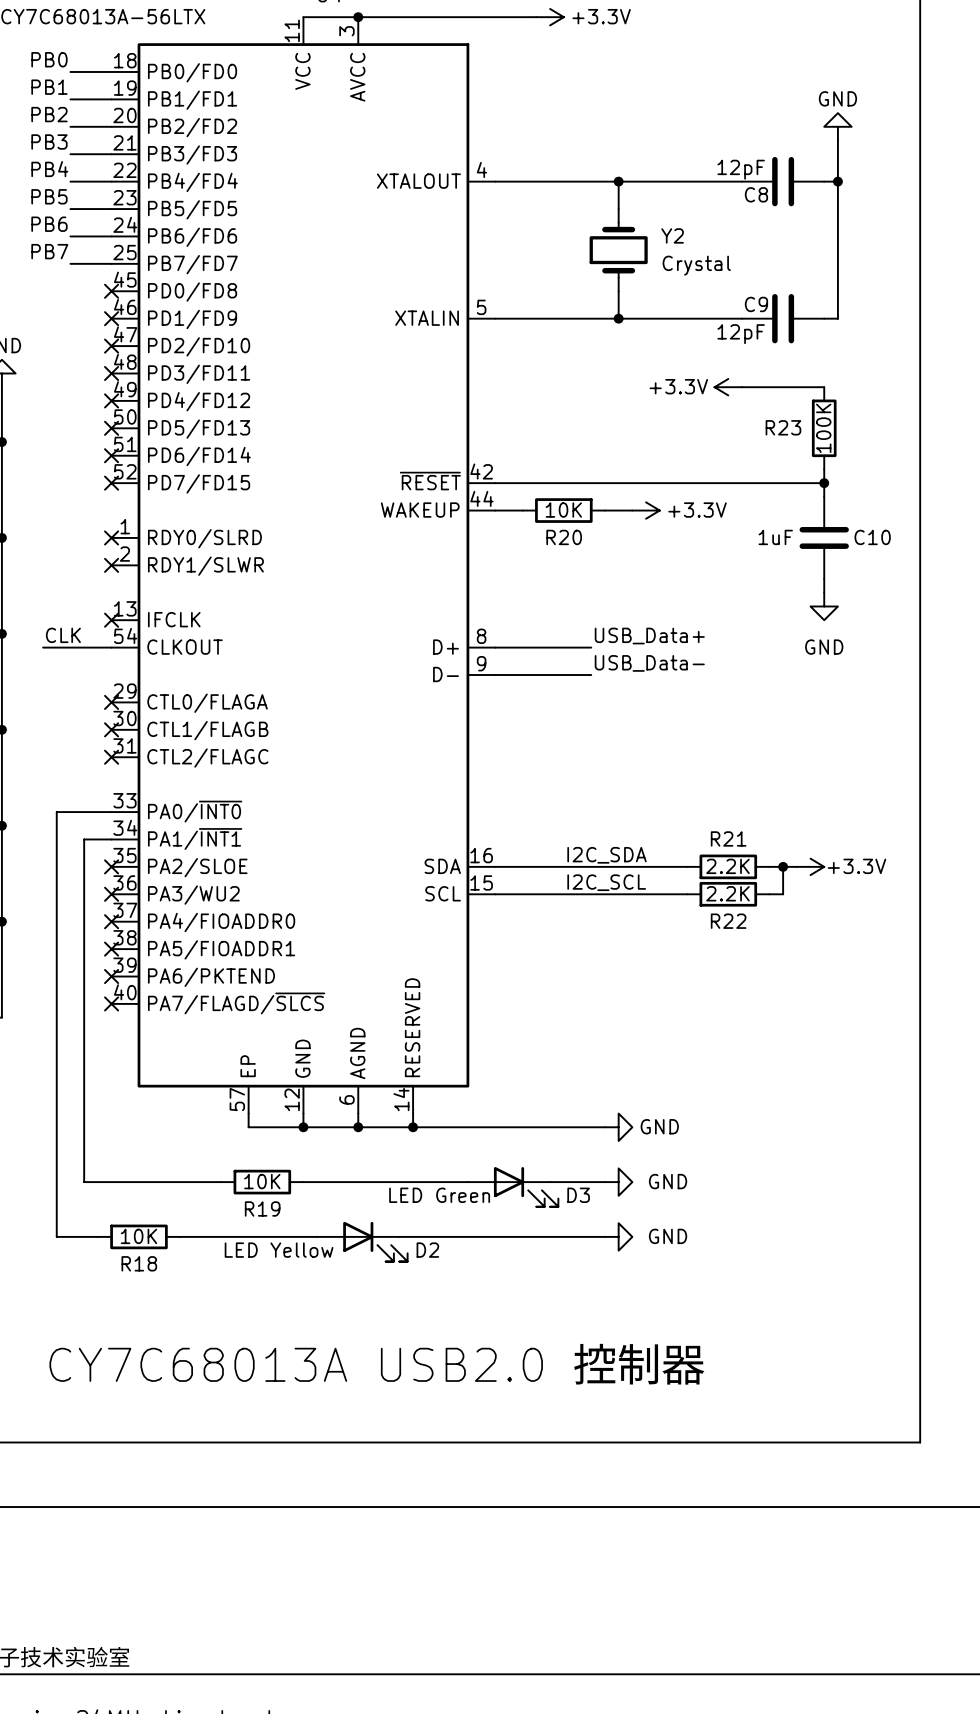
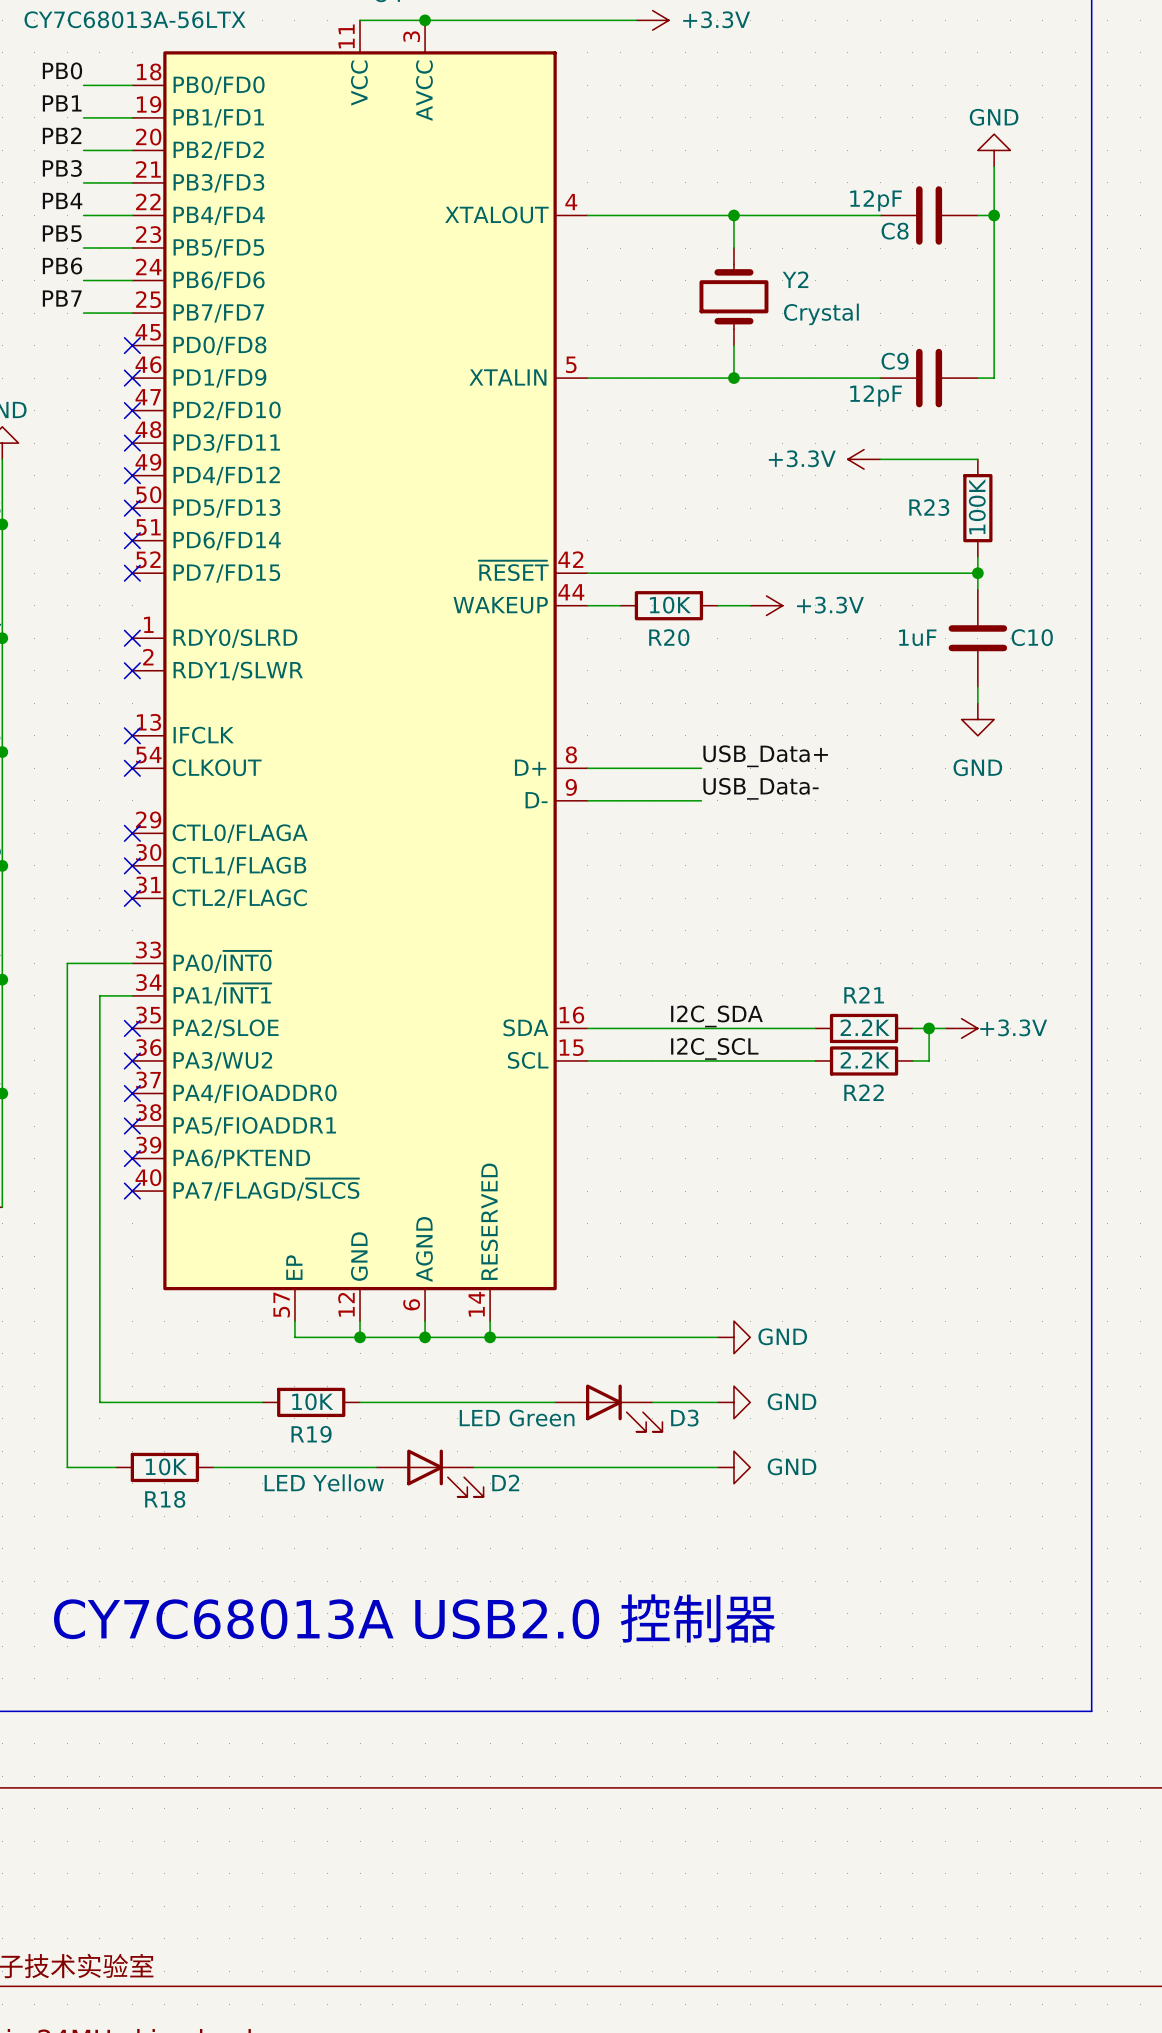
label: CLK (63, 635) -> none
wire: (43, 647) (111, 647) -> none
no-connect mark: none -> (132, 768)

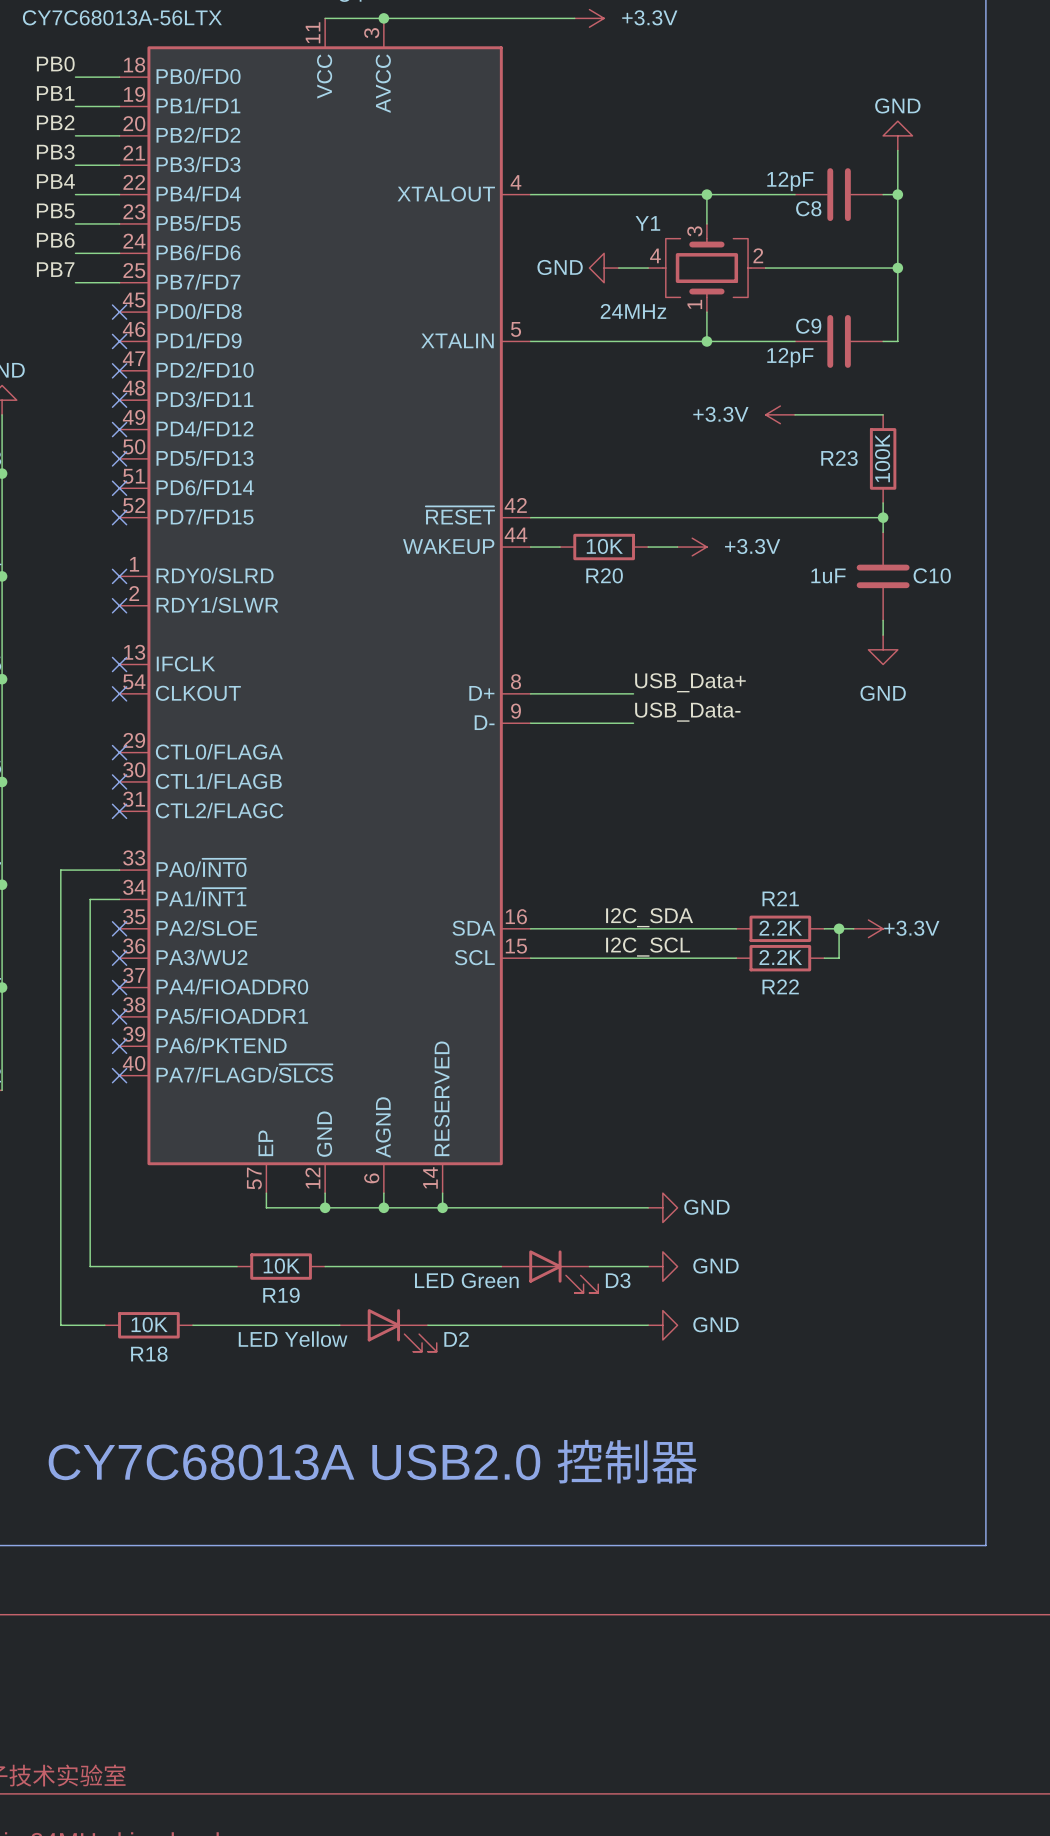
wire: (733, 215) (733, 248) -> (706, 194) (706, 223)
junction position: (733, 215) -> (706, 194)
power symbol: none -> GND (604, 268)
wire: none -> (618, 268) (648, 268)
Y2: Crystal (733, 296) -> none
Y1: none -> 24MHz (706, 268)
wire: none -> (765, 268) (897, 268)
junction: none -> (897, 268)
wire: (733, 345) (733, 378) -> (706, 312) (706, 341)
junction position: (733, 378) -> (706, 341)

